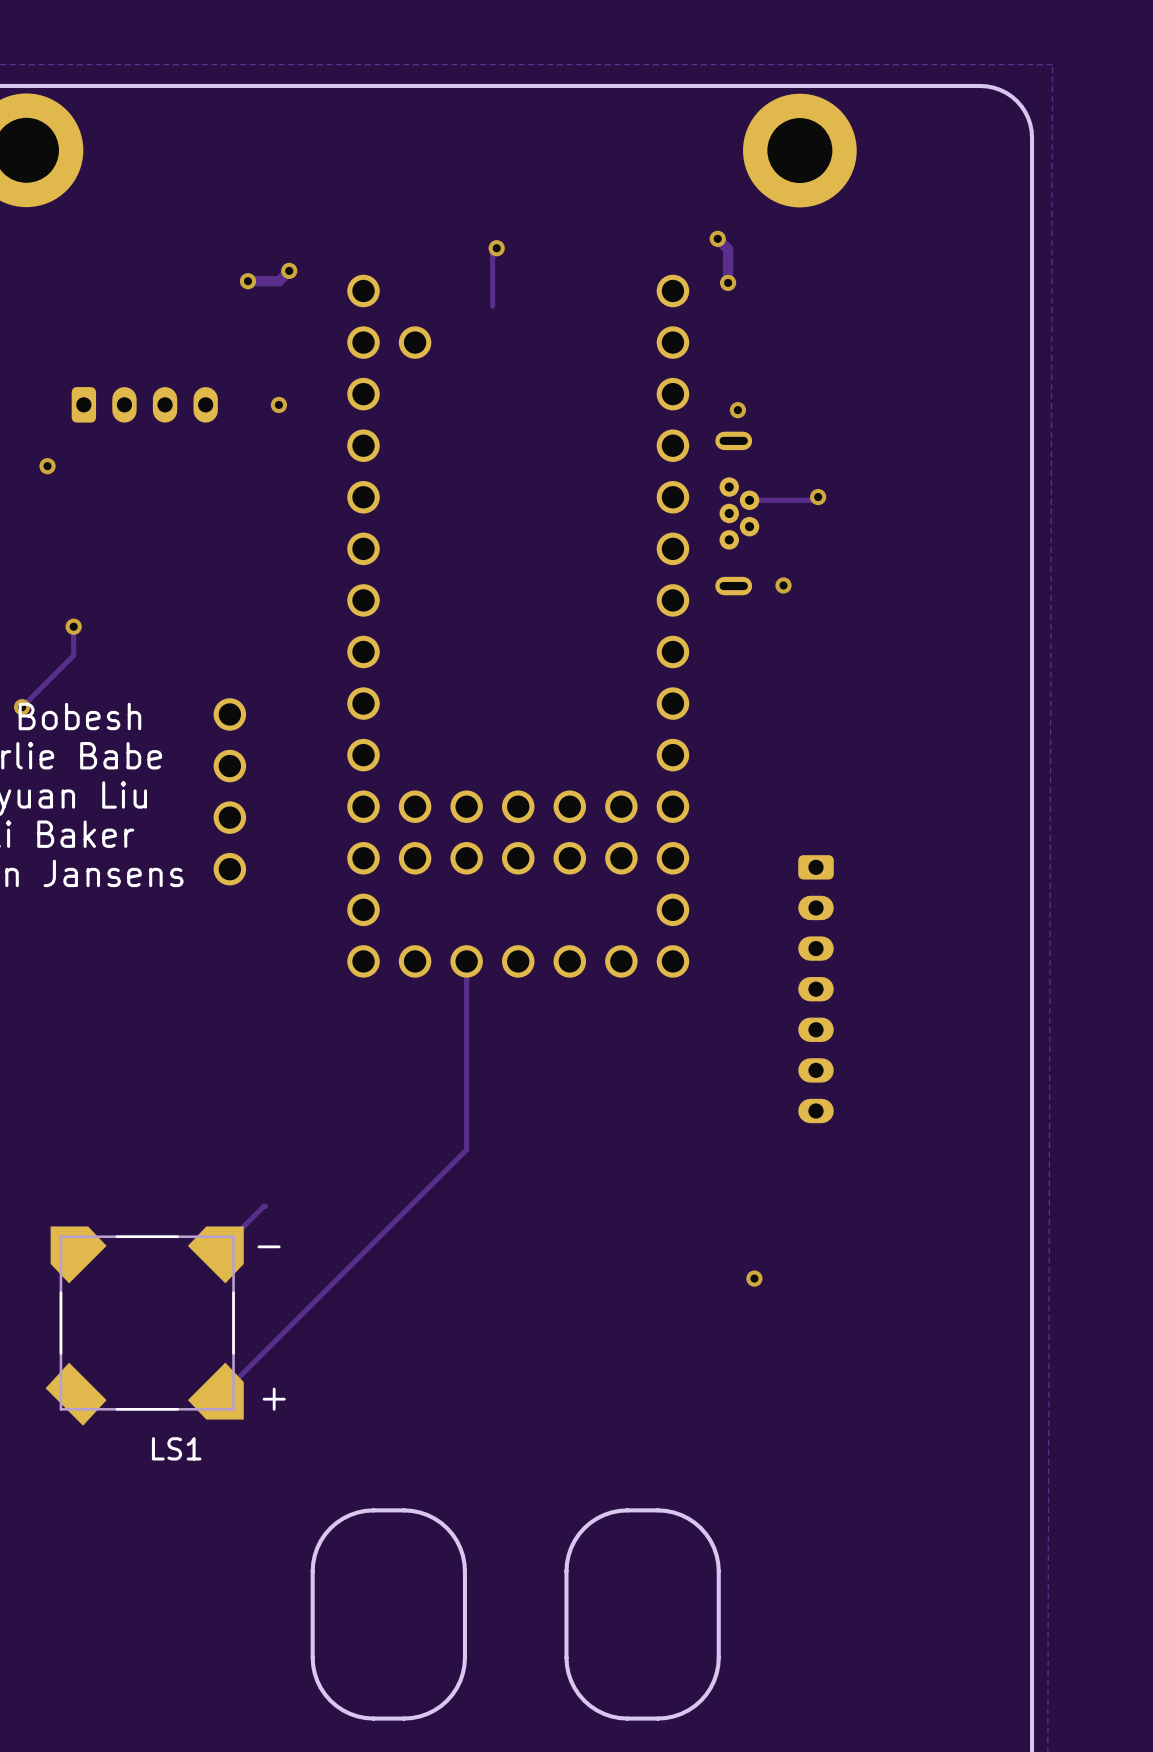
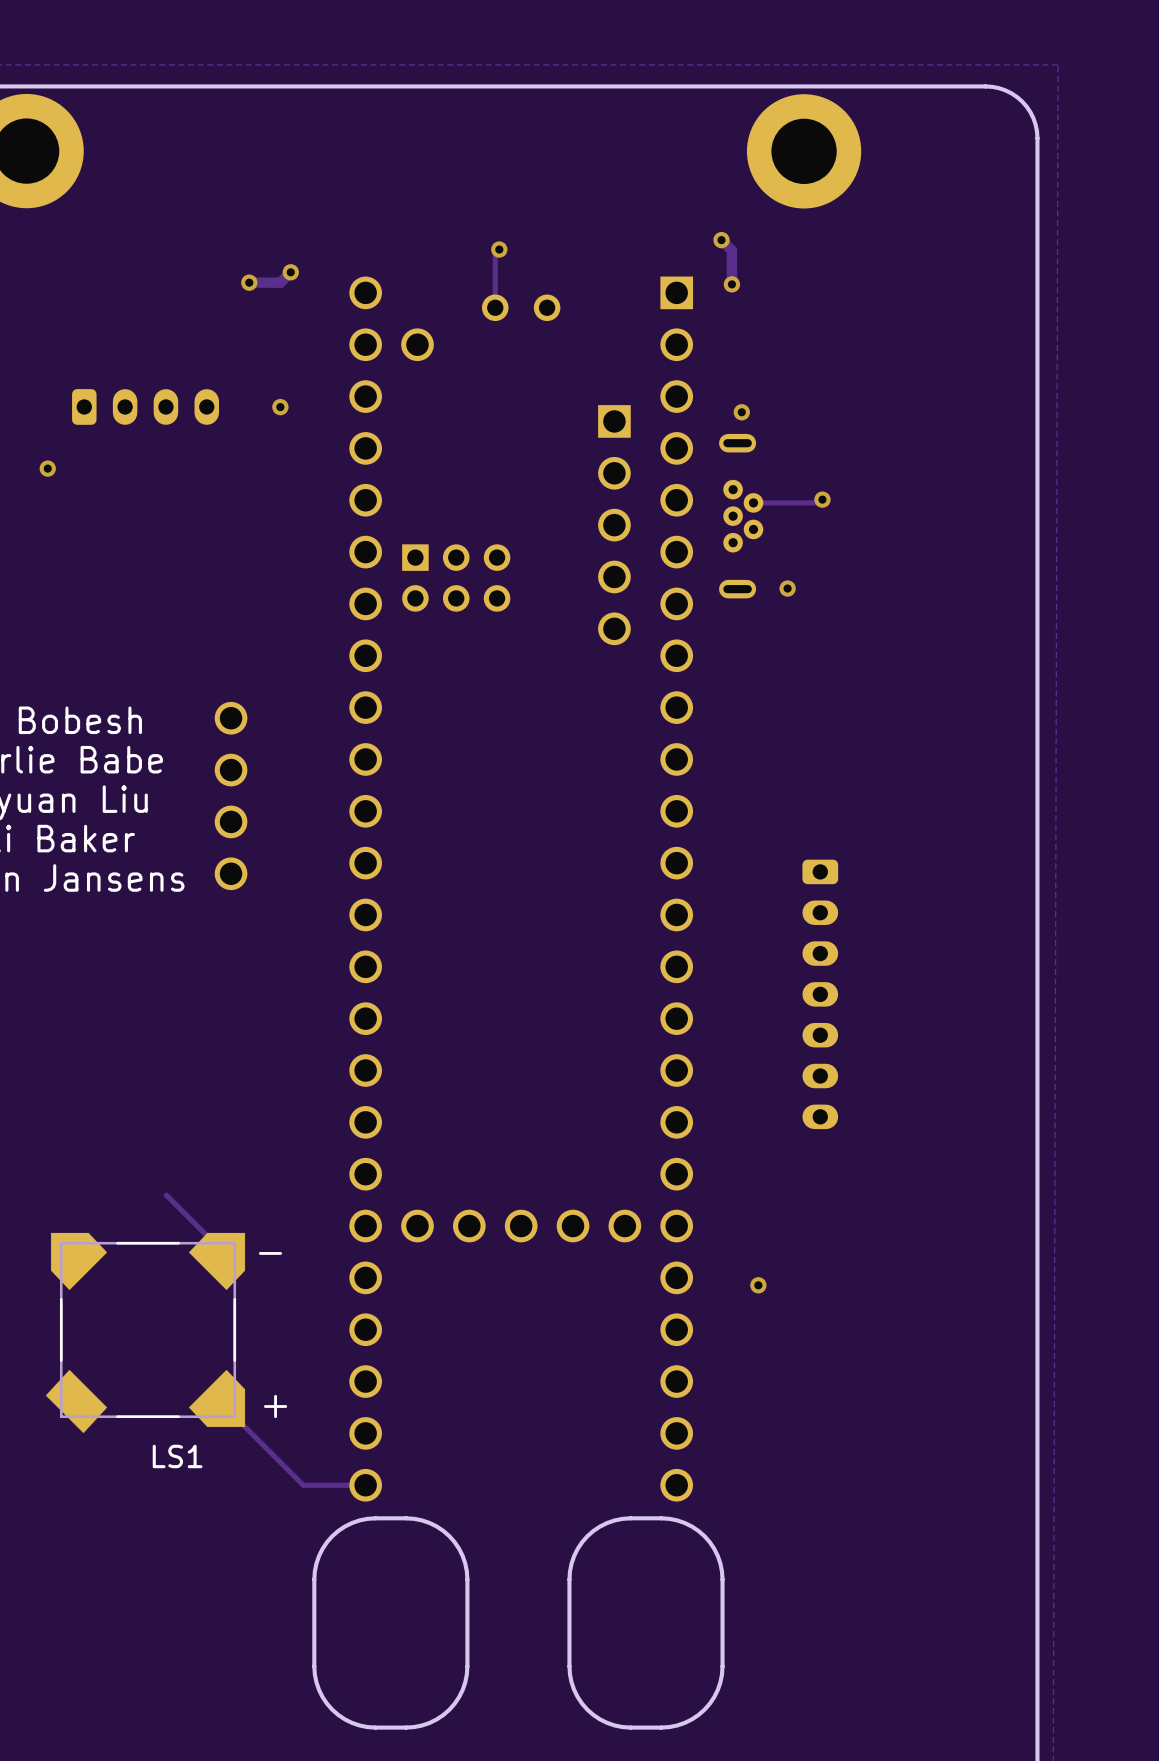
track: (73, 626) (73, 655) (22, 707) -> none
via: (73, 626) -> none
part: (518, 626) -> none
via: (22, 707) -> none
part: none -> (521, 889)
track: (466, 961) (466, 1149) (220, 1396) -> (365, 1485) (303, 1485) (221, 1403)
track: none -> (166, 1195) (221, 1250)
track: (265, 1206) (220, 1249) -> none

